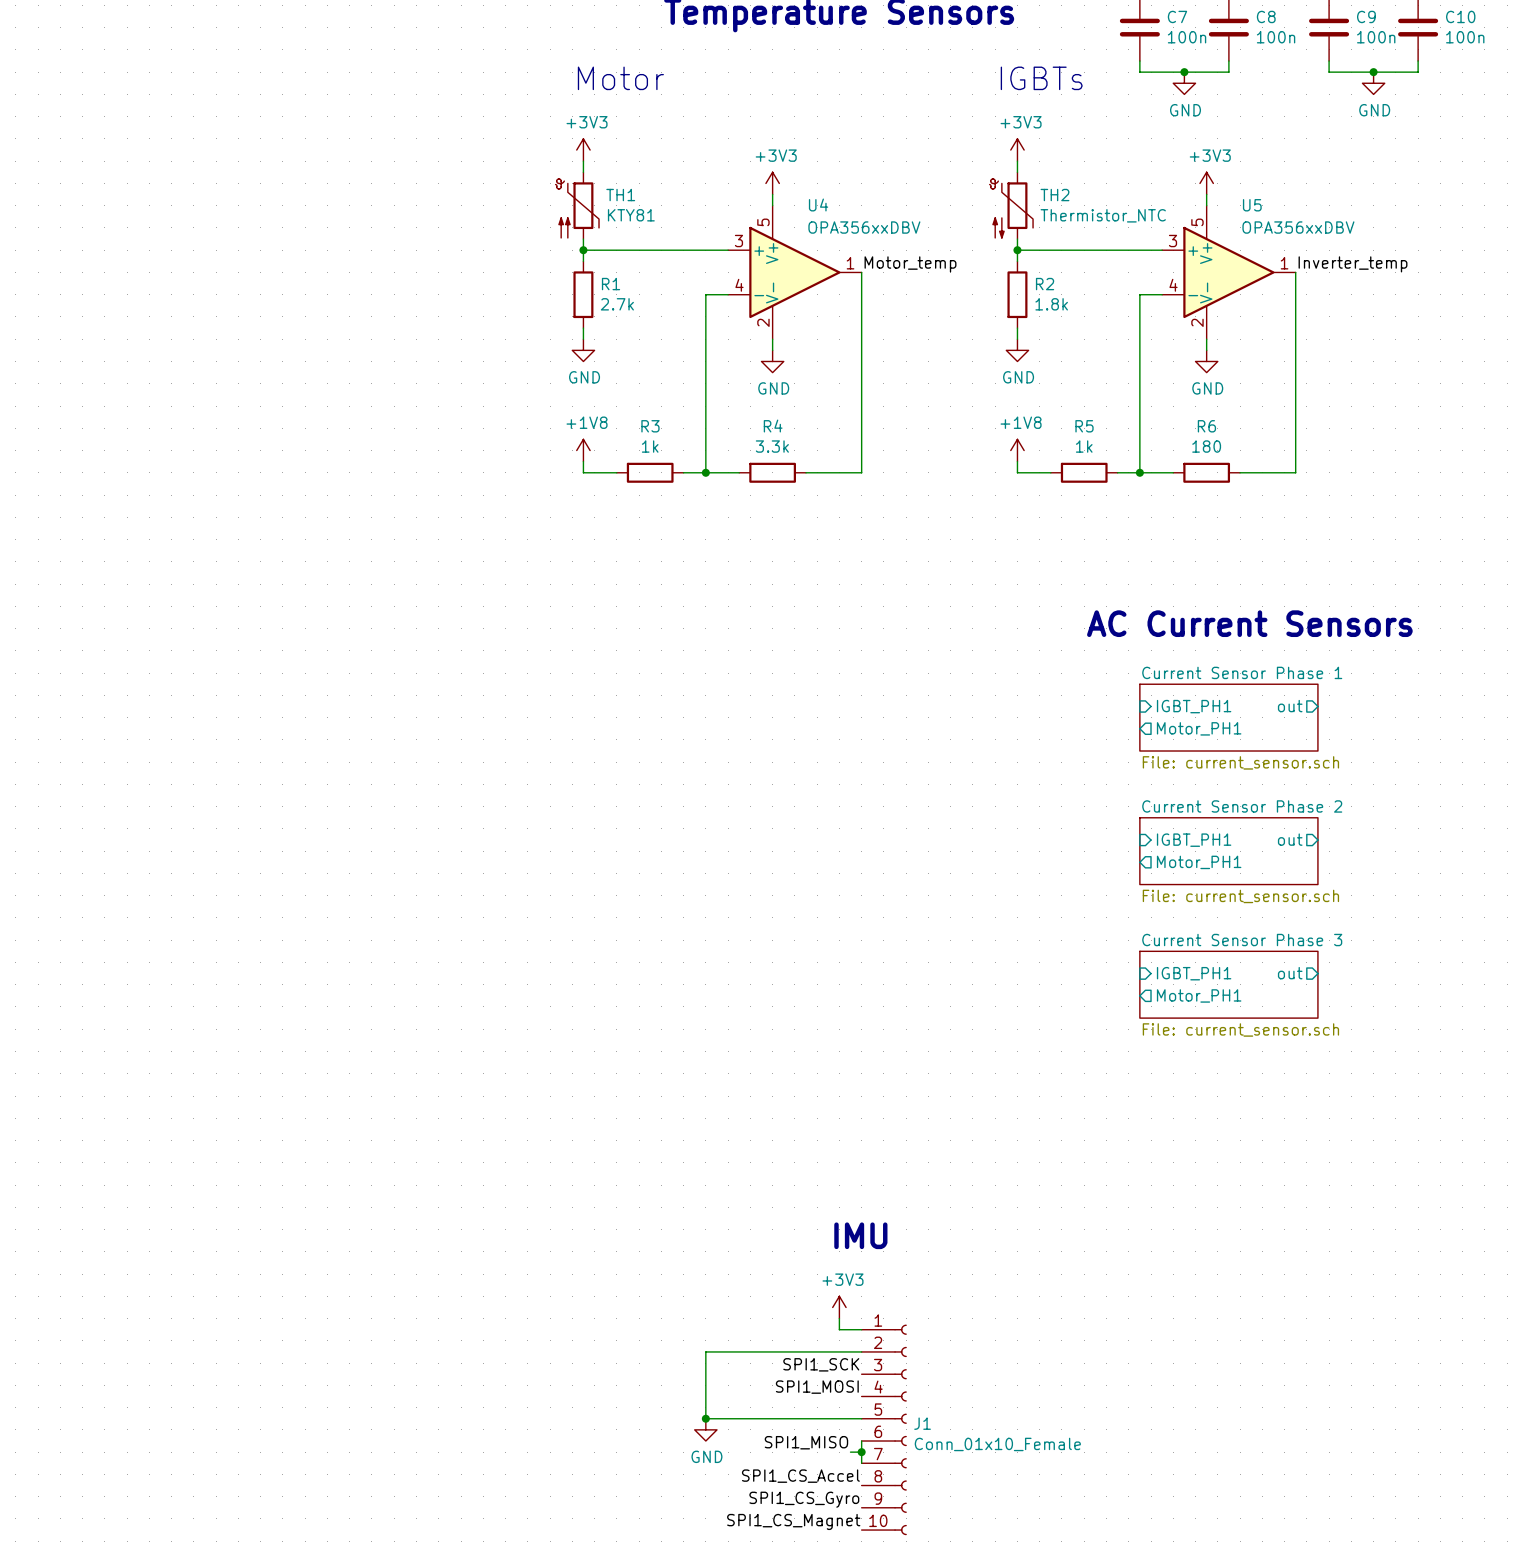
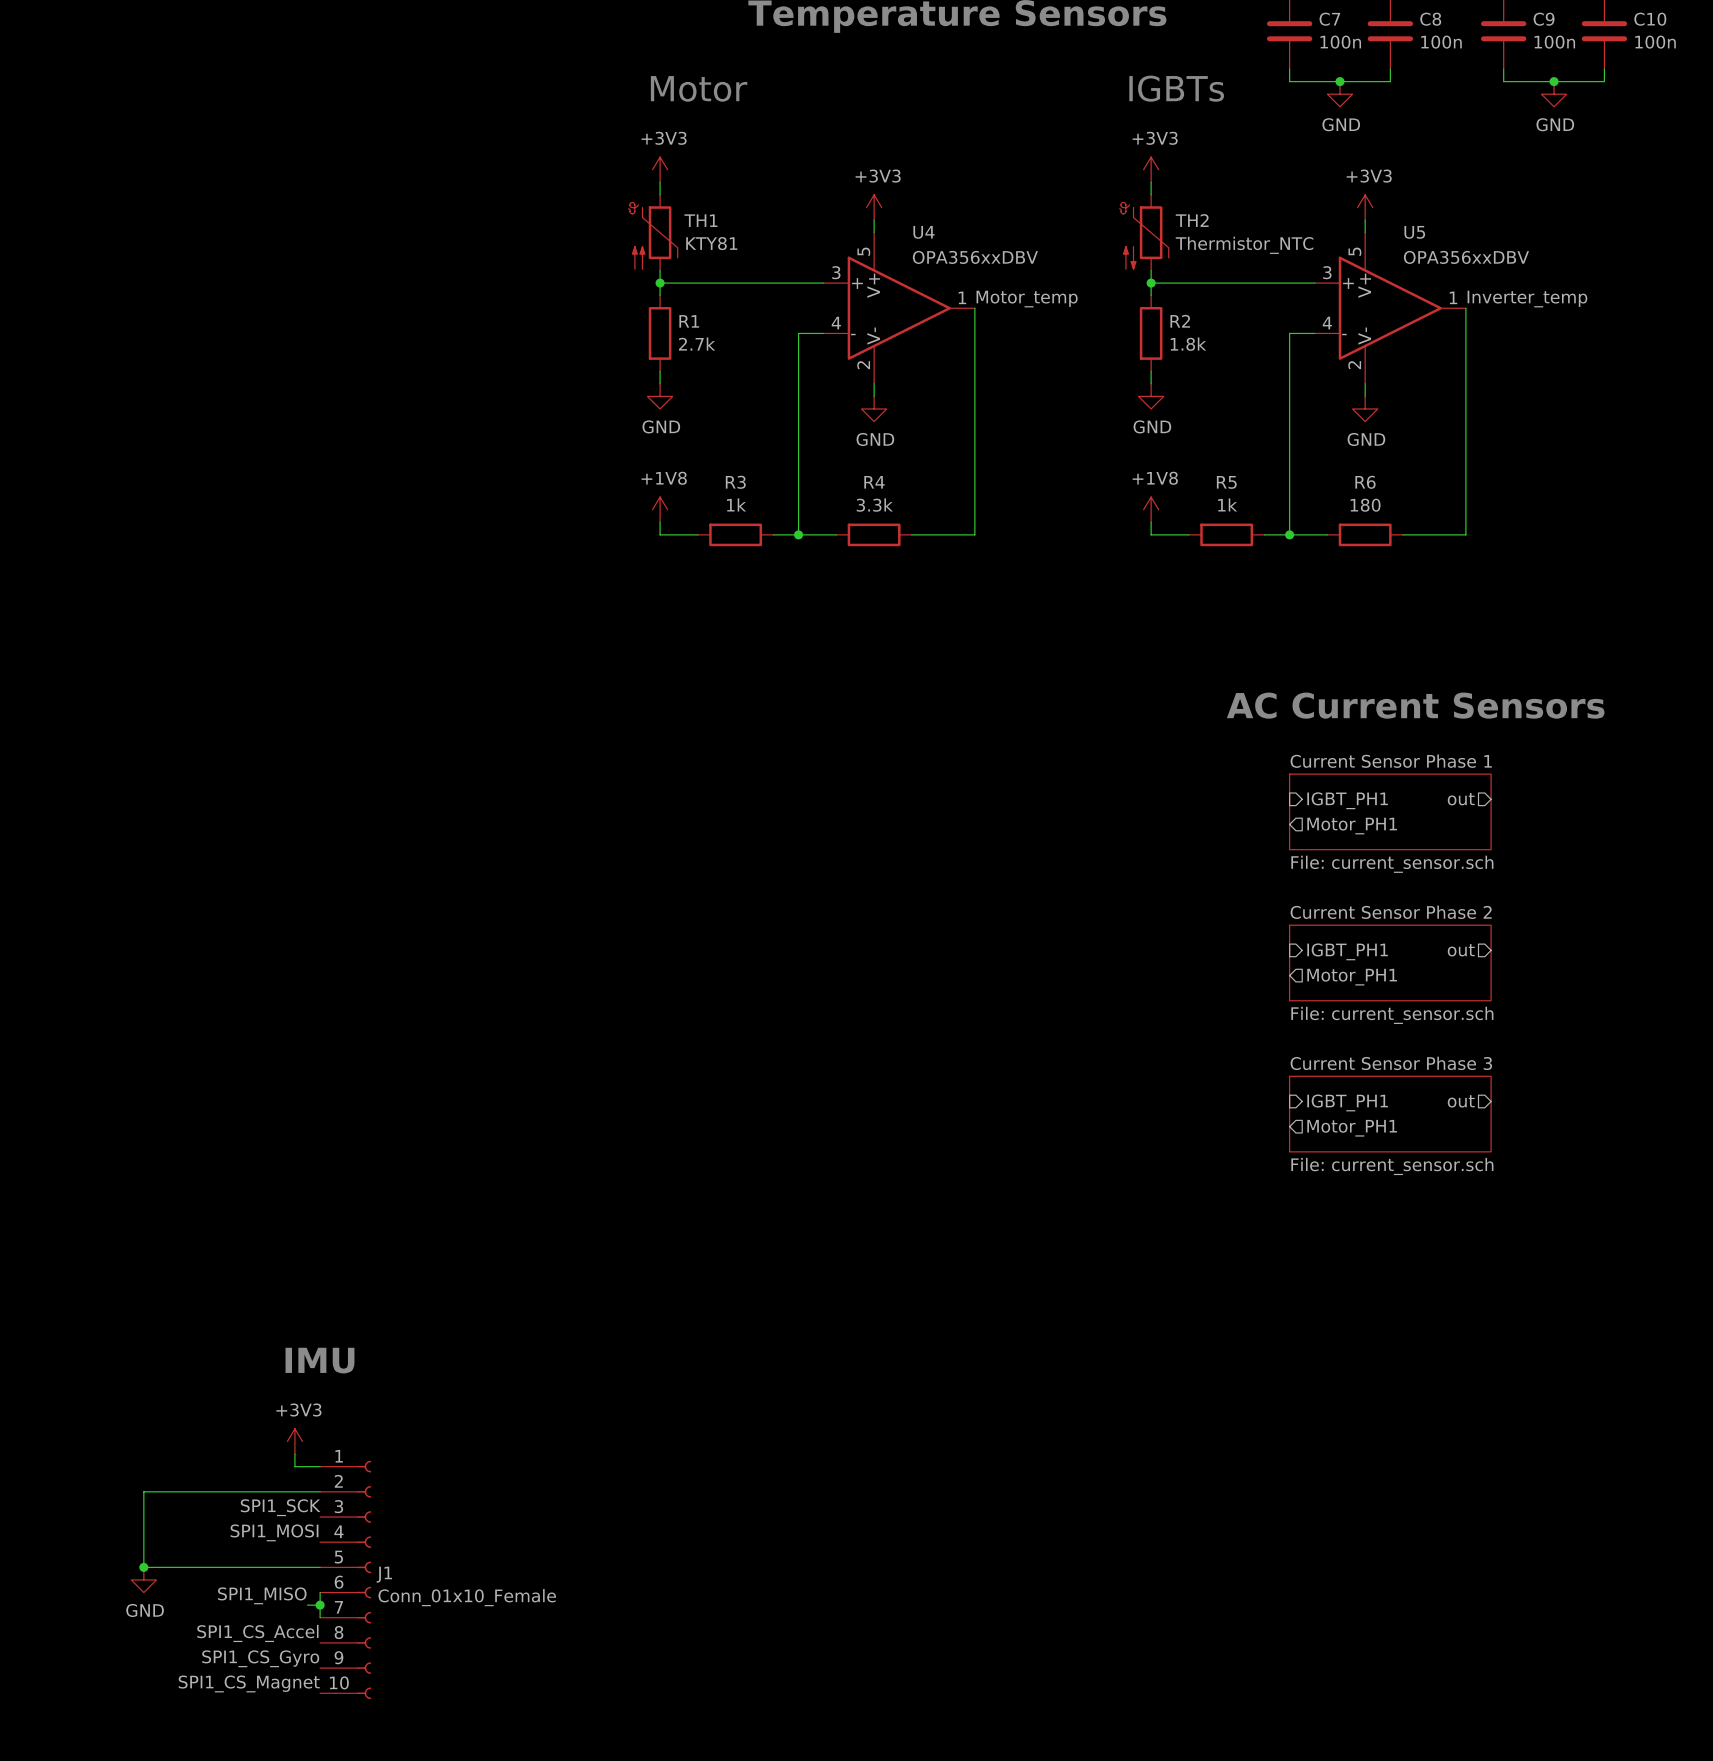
text: none -> IMU (319, 1360)
text: IMU (860, 1235) -> none
power symbol: none -> +3V3 (294, 1441)
wire: none -> (294, 1454) (294, 1466) (320, 1466)
power symbol: +3V3 (839, 1307) -> none
wire: none -> (320, 1491) (143, 1491) (143, 1567) (320, 1567)
wire: (839, 1318) (839, 1329) (861, 1329) -> none
label: none -> SPI1_SCK (280, 1507)
wire: (861, 1351) (705, 1351) (705, 1418) (861, 1418) -> none
label: none -> SPI1_MOSI (274, 1532)
label: SPI1_SCK (821, 1364) -> none
junction: none -> (143, 1567)
label: SPI1_MOSI (817, 1387) -> none
power symbol: none -> GND (143, 1579)
wire: none -> (320, 1592) (320, 1617)
label: none -> SPI1_MISO (262, 1595)
wire: none -> (307, 1605) (320, 1605)
junction: none -> (320, 1605)
junction: (705, 1418) -> none
power symbol: GND (705, 1429) -> none
J1 position: (884, 1429) -> (345, 1579)
wire: (861, 1441) (861, 1463) -> none
label: none -> SPI1_CS_Accel (257, 1633)
label: SPI1_MISO (806, 1442) -> none
wire: (850, 1452) (861, 1452) -> none
junction: (861, 1452) -> none
label: none -> SPI1_CS_Gyro (260, 1658)
label: SPI1_CS_Accel (800, 1476) -> none
label: none -> SPI1_CS_Magnet (249, 1683)
label: SPI1_CS_Gyro (804, 1499) -> none
label: SPI1_CS_Magnet (793, 1521) -> none

